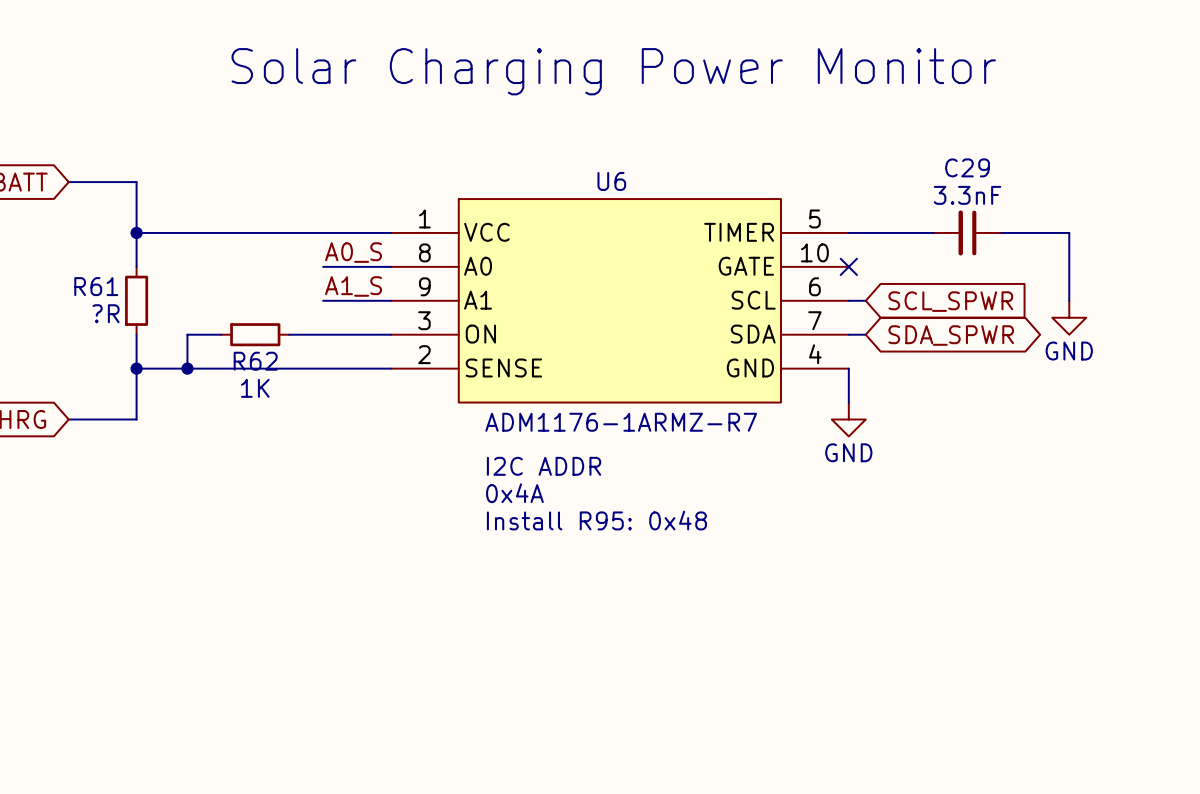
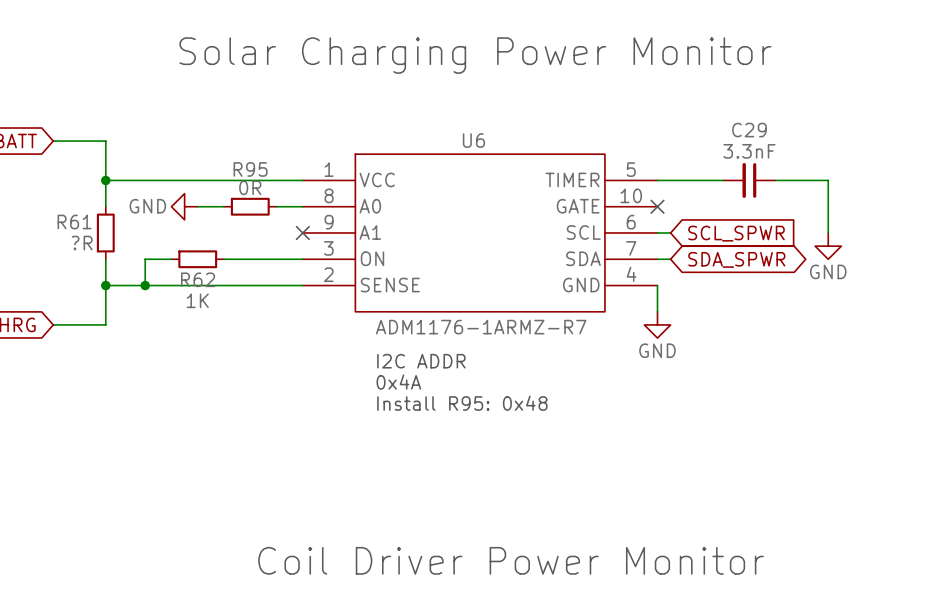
label: A0_S (353, 252) -> none
power symbol: none -> GND (184, 206)
wire: (323, 266) (357, 266) -> (197, 206) (224, 206)
R95: none -> 0R (250, 206)
label: A1_S (353, 286) -> none
wire: (323, 300) (390, 300) -> none
no-connect mark: none -> (302, 233)
text: none -> Coil Driver Power Monitor (511, 560)

